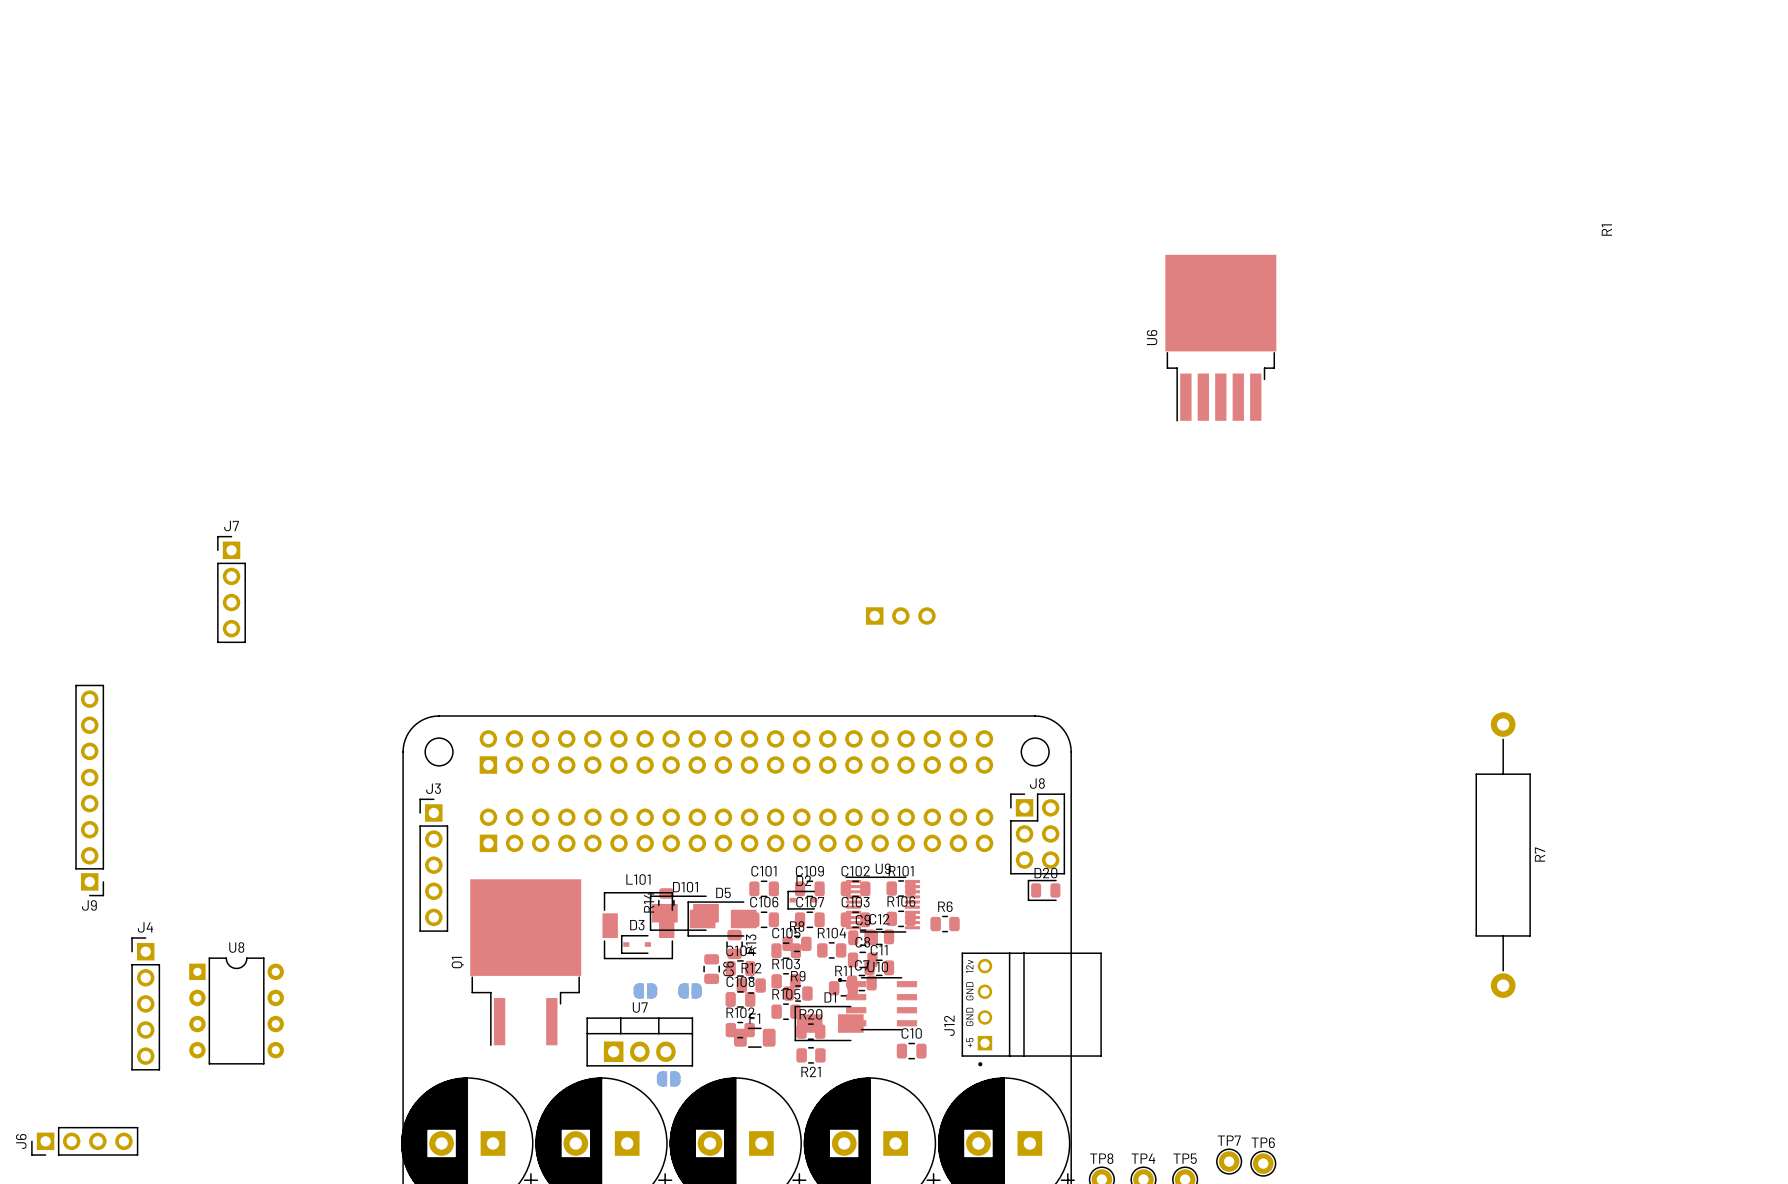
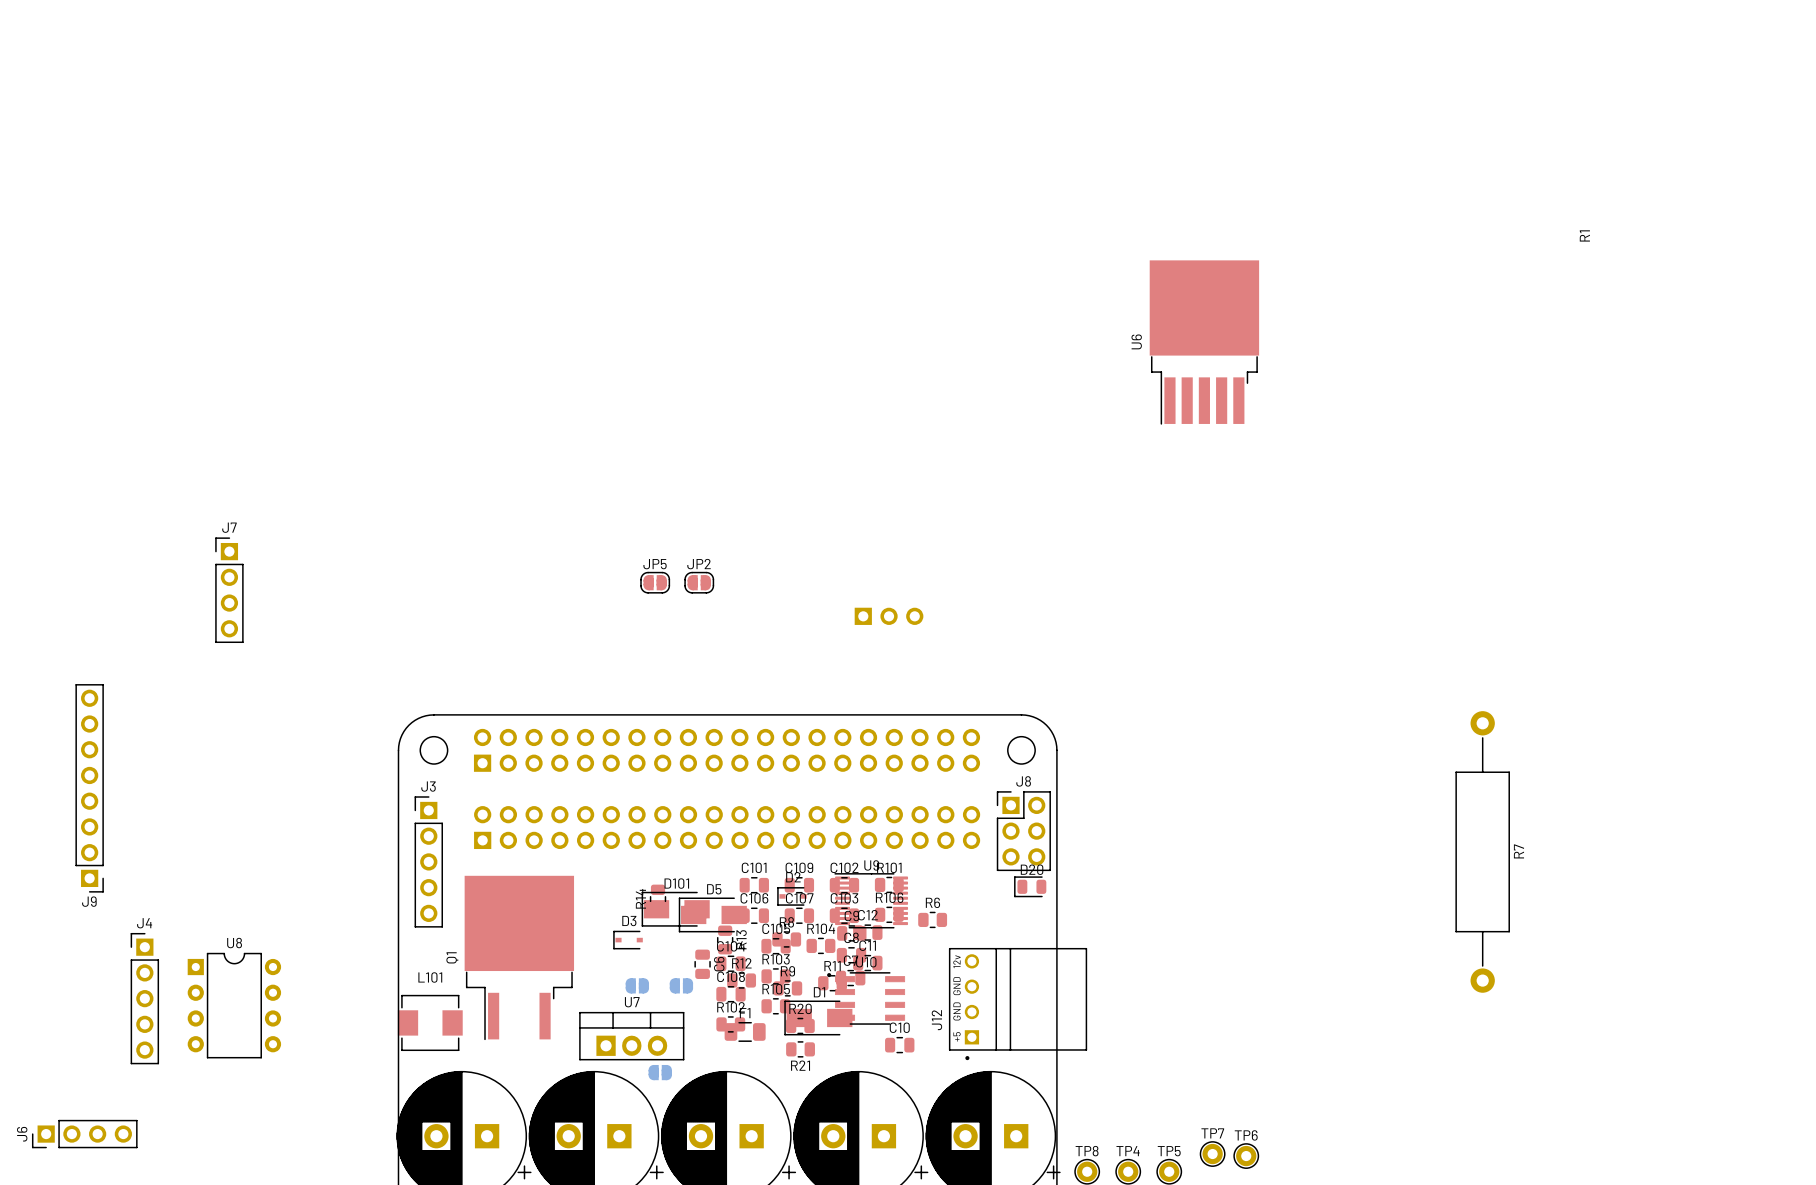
JP5: none -> (655, 582)
JP2: none -> (699, 582)
L101 footprint: [602, 892, 675, 960] -> [397, 994, 463, 1051]

